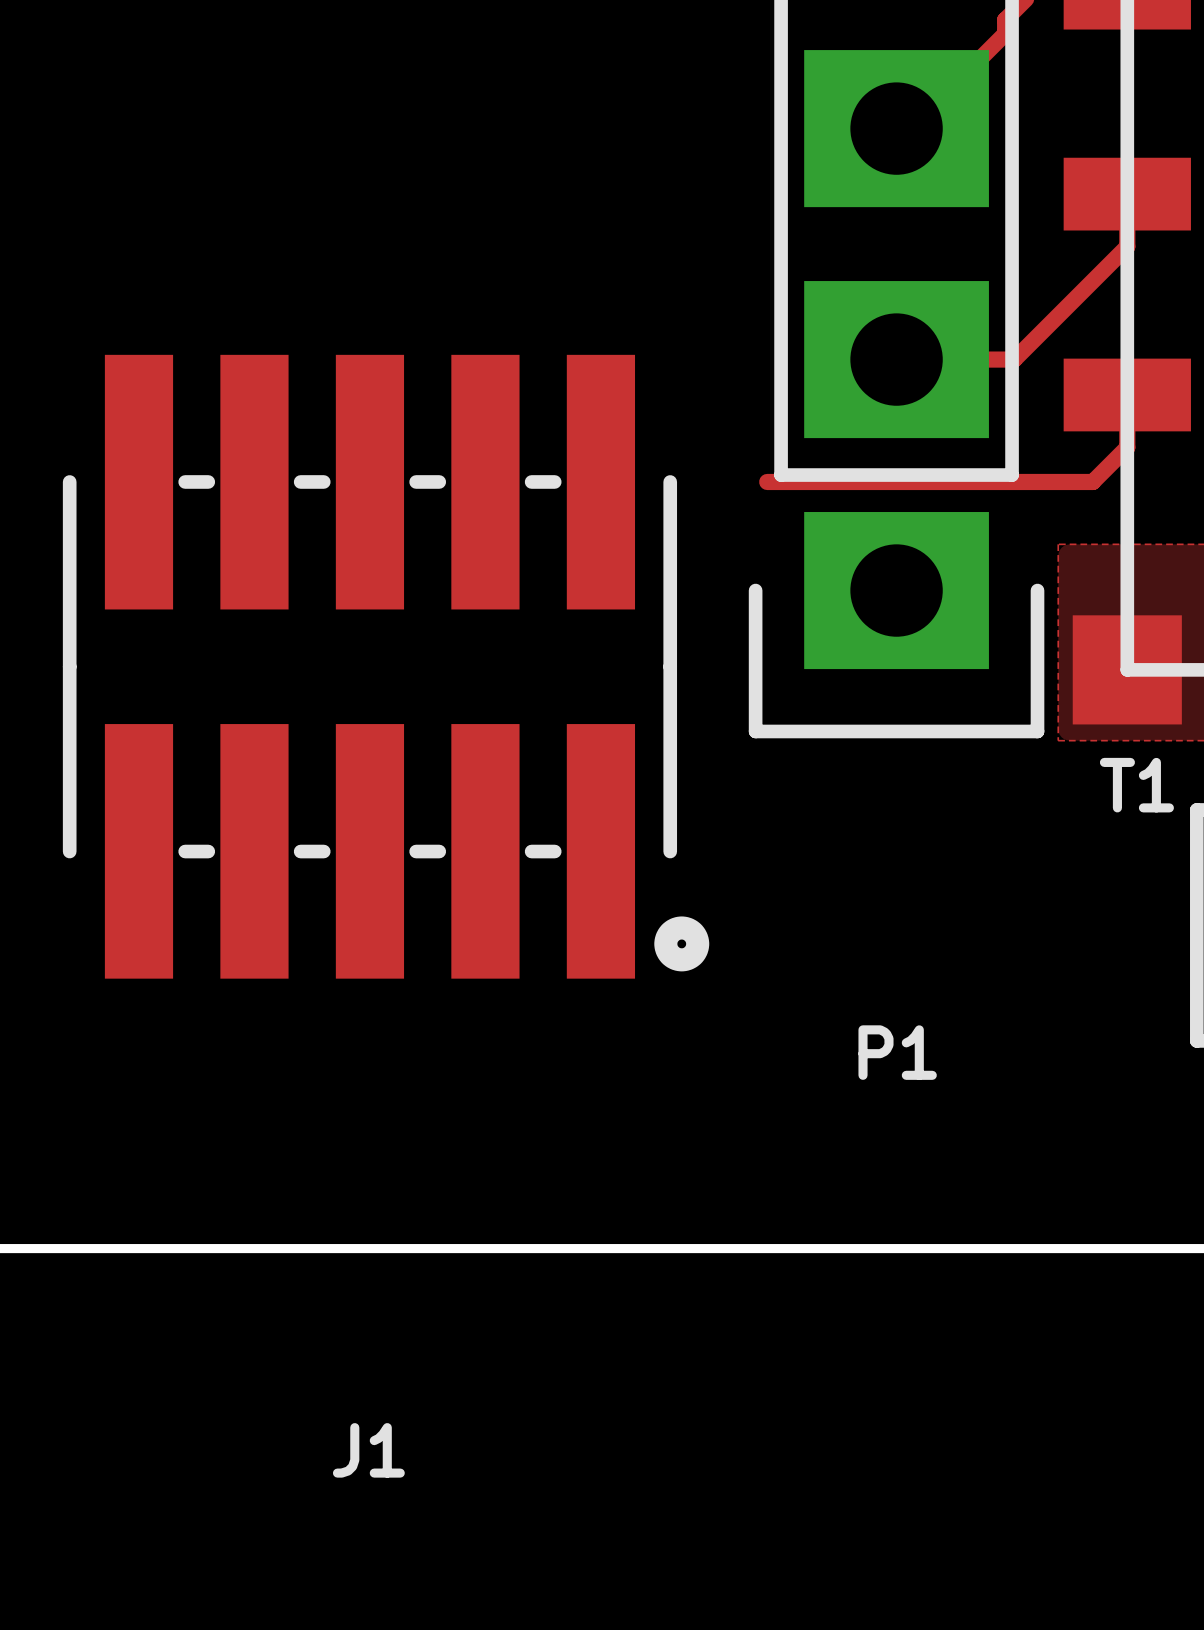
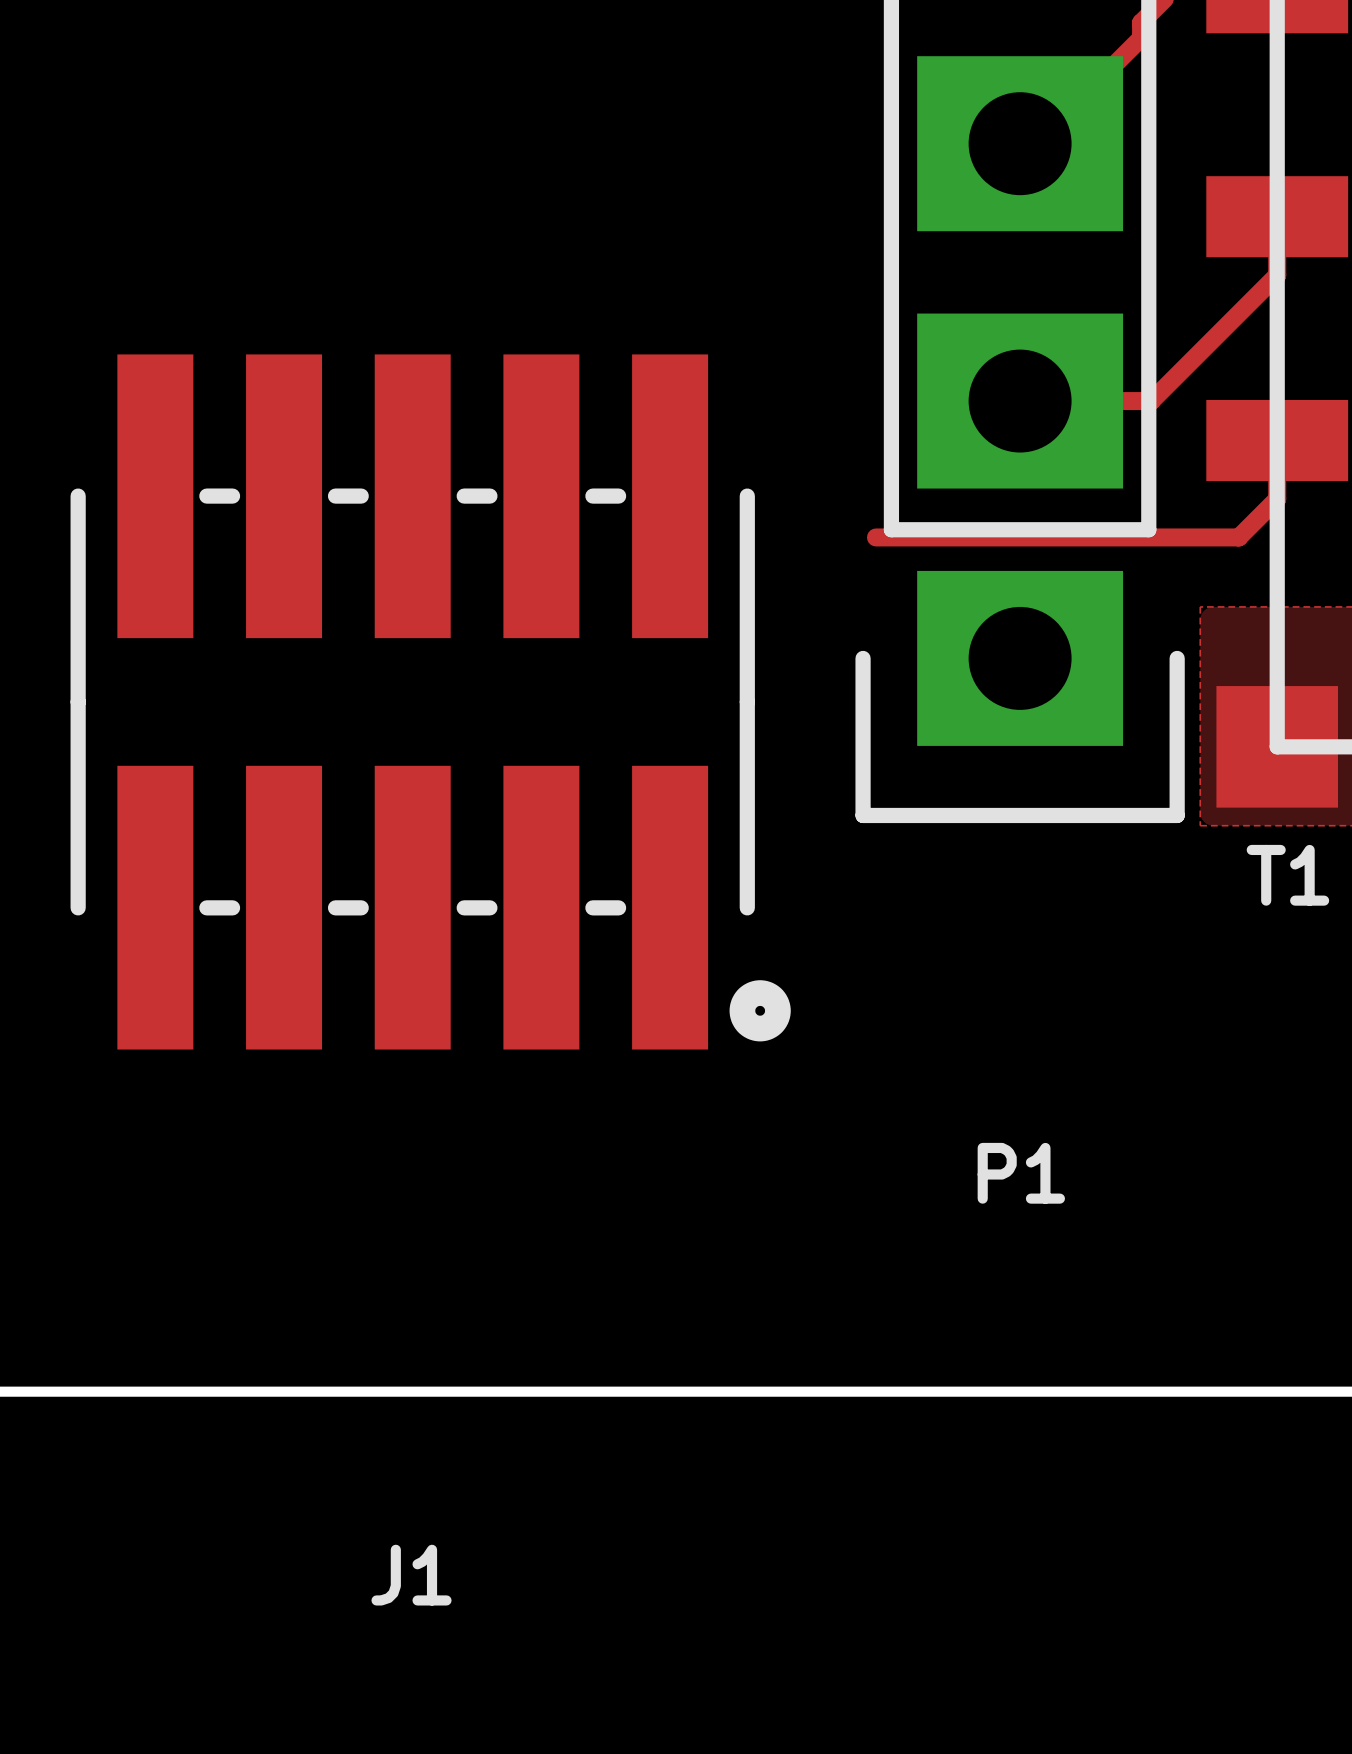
J1 position: (386, 666) -> (430, 701)

